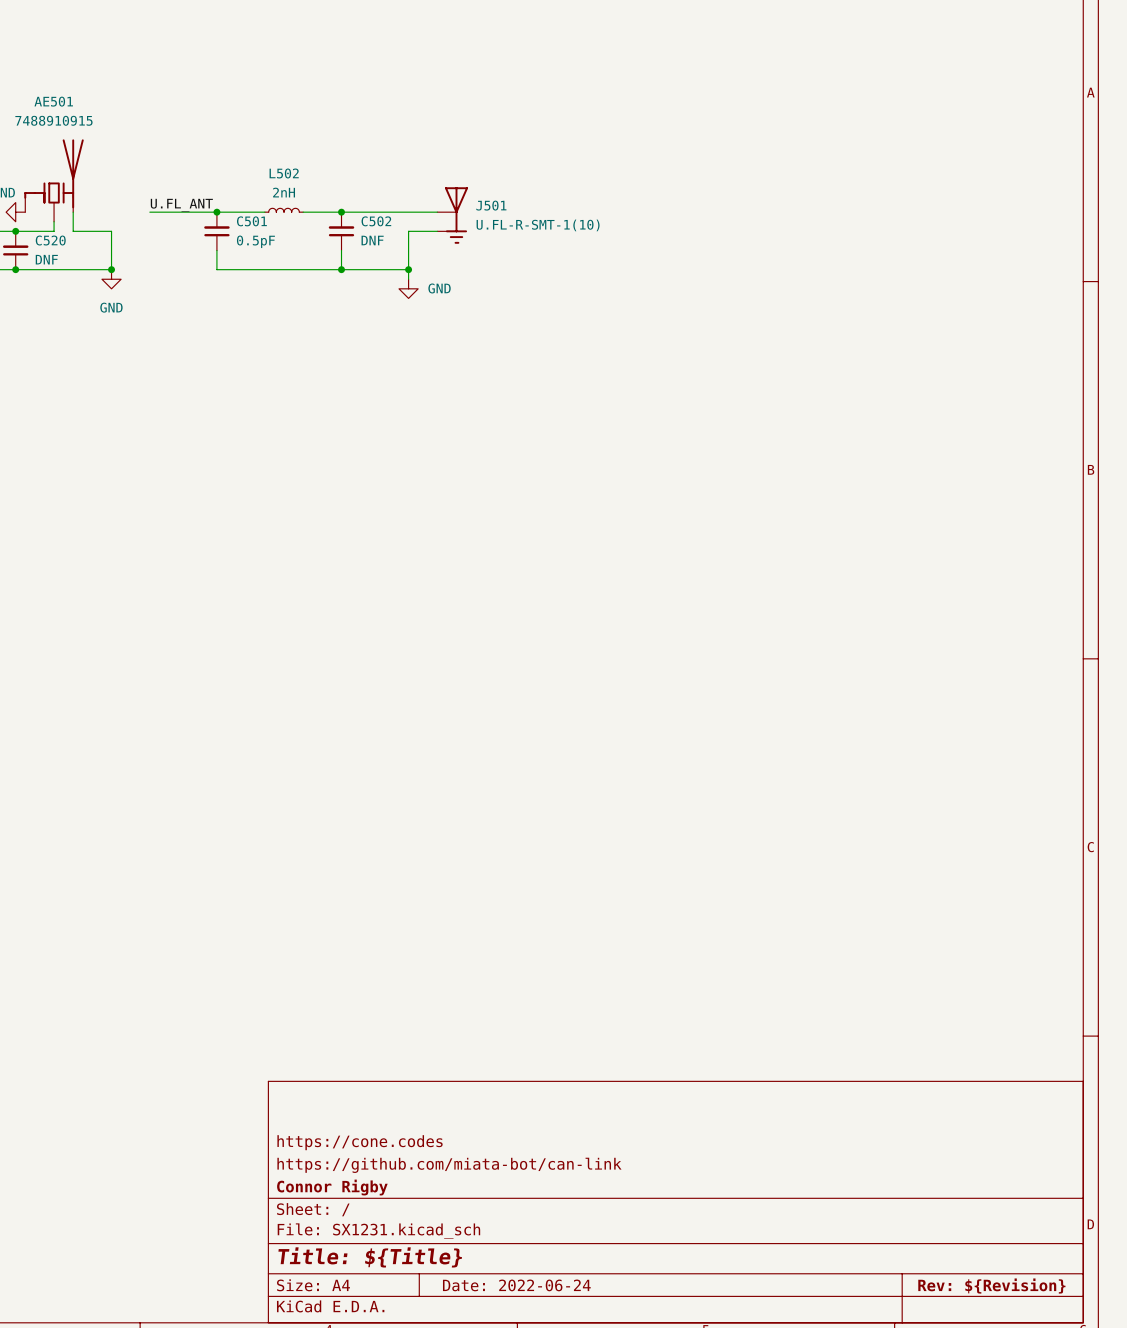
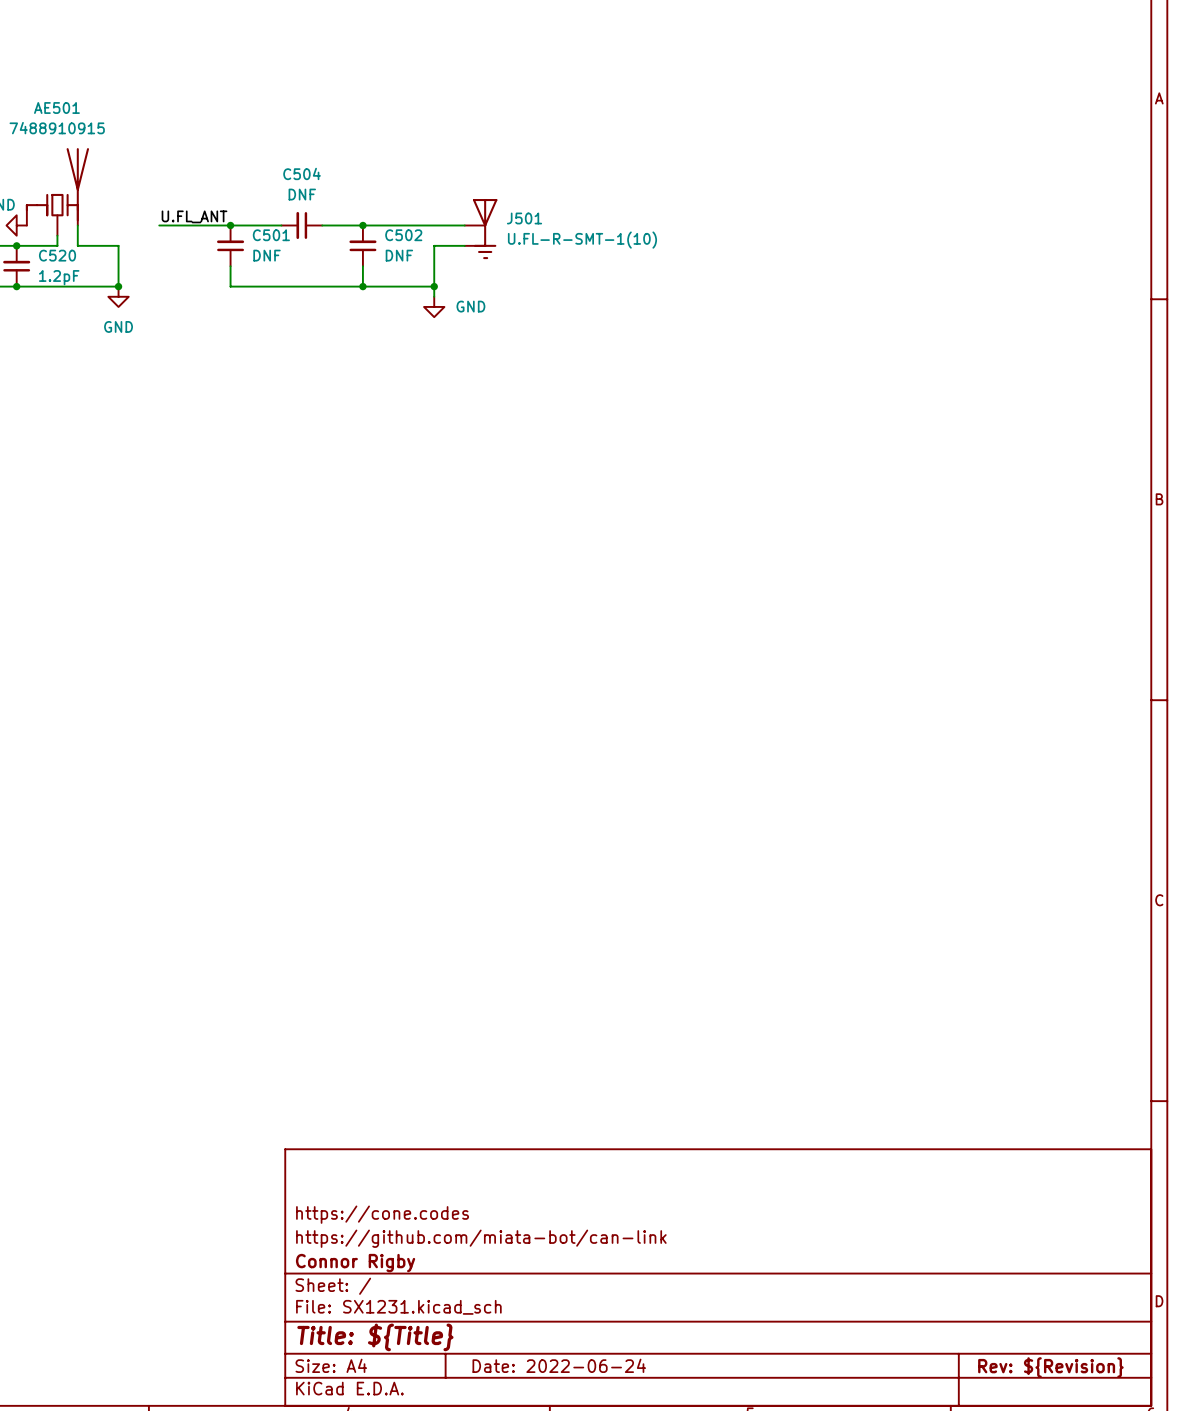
L502: 2nH (284, 210) -> none
C504: none -> DNF (301, 225)
C501 value: 0.5pF (255, 241) -> DNF (267, 255)
C520 value: DNF (46, 259) -> 1.2pF (59, 277)

